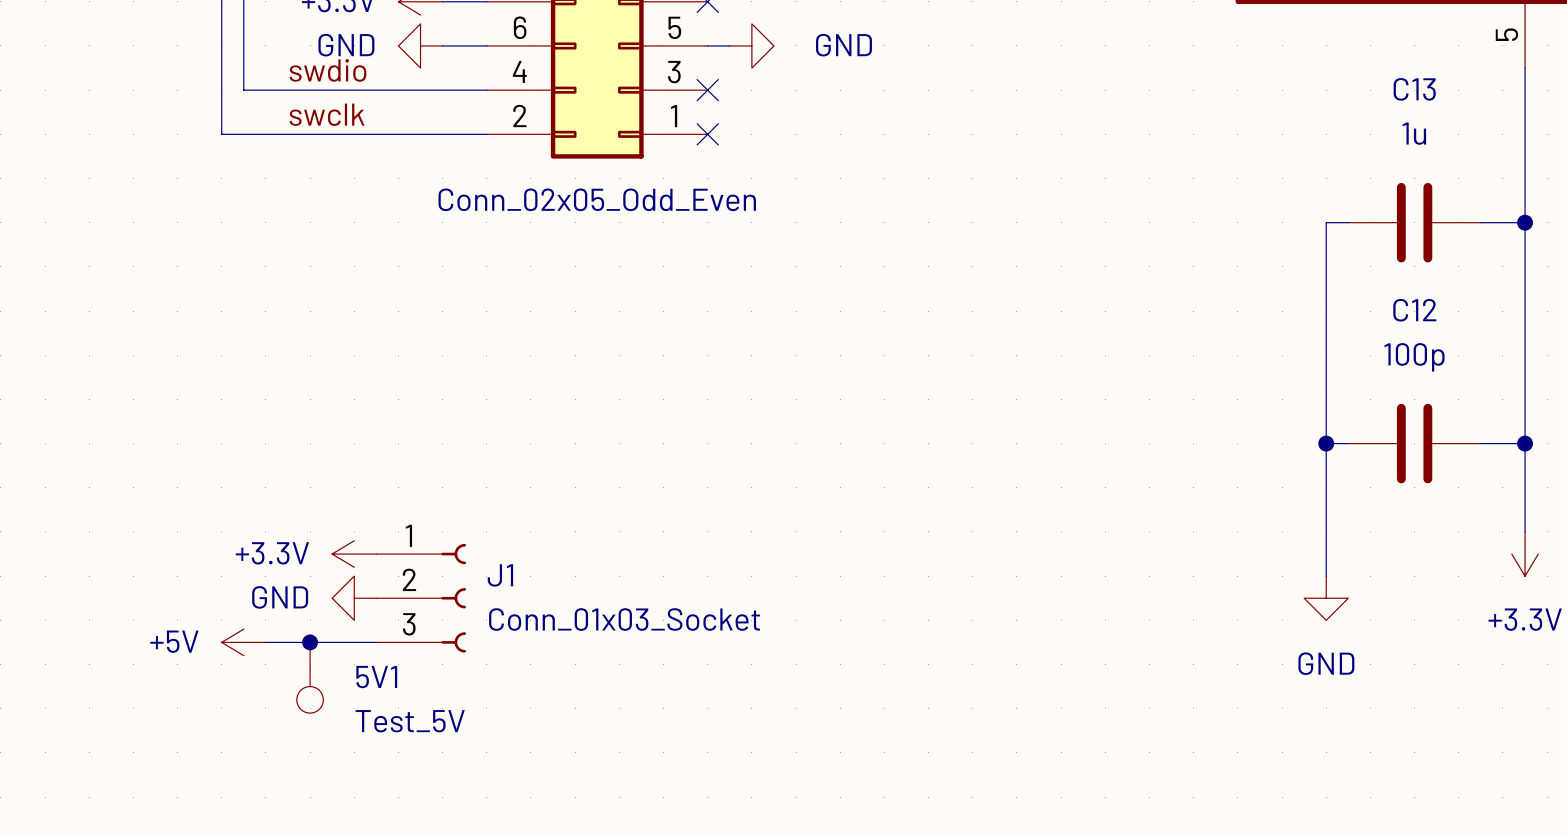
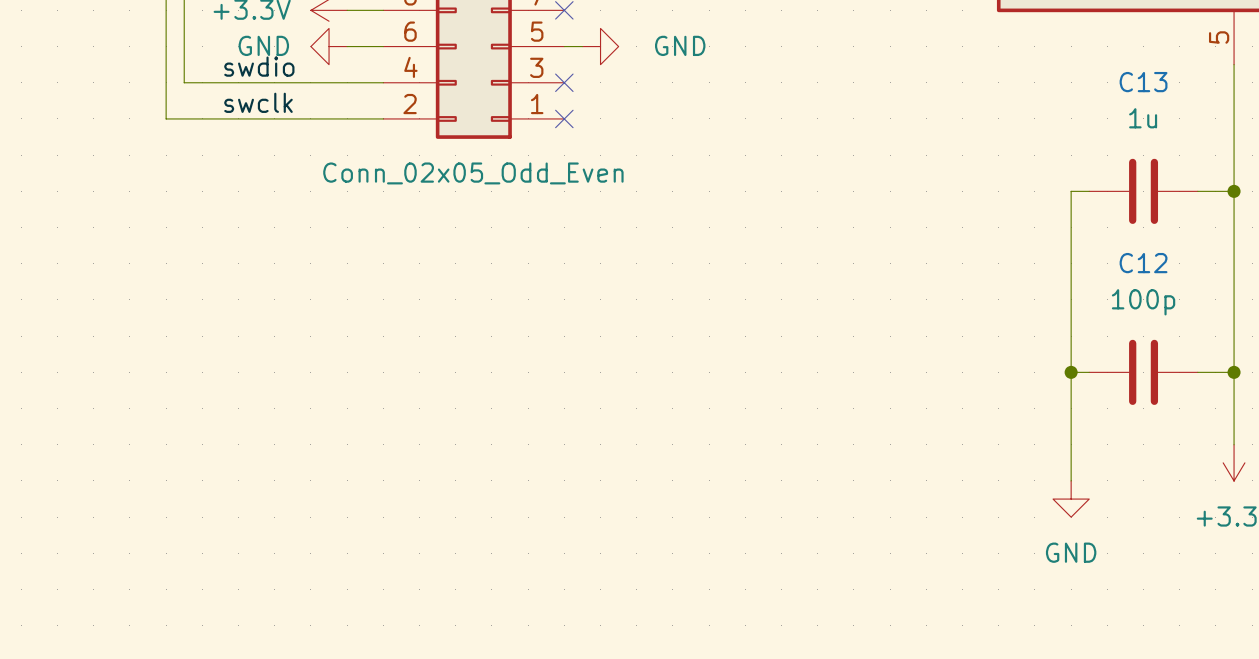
power symbol: +3.3V (354, 554) -> none
power symbol: GND (354, 598) -> none
J1: Conn_01x03_Socket (421, 598) -> none
power symbol: +5V (243, 642) -> none
wire: (265, 642) (376, 642) -> none
junction: (310, 642) -> none
5V1: Test_5V (310, 677) -> none

